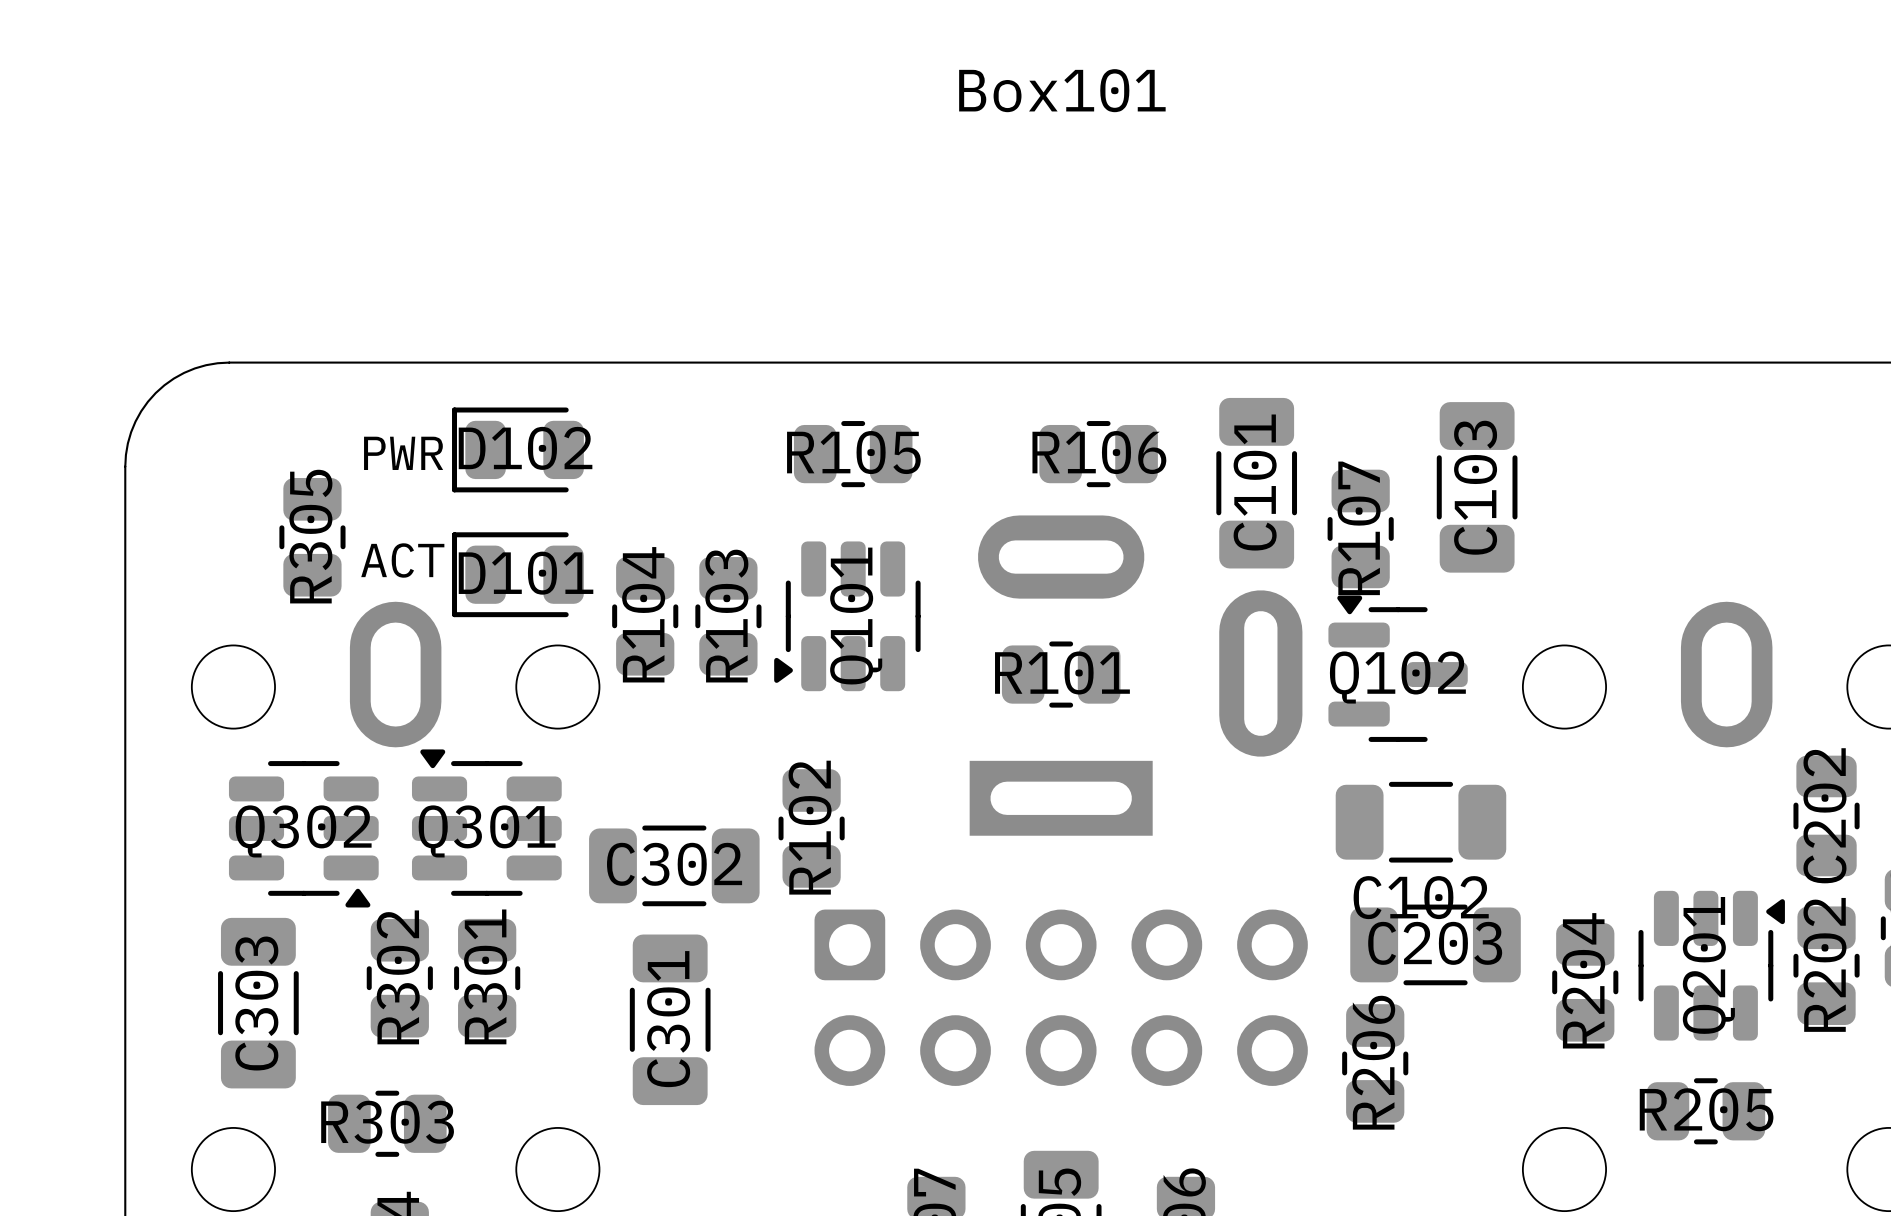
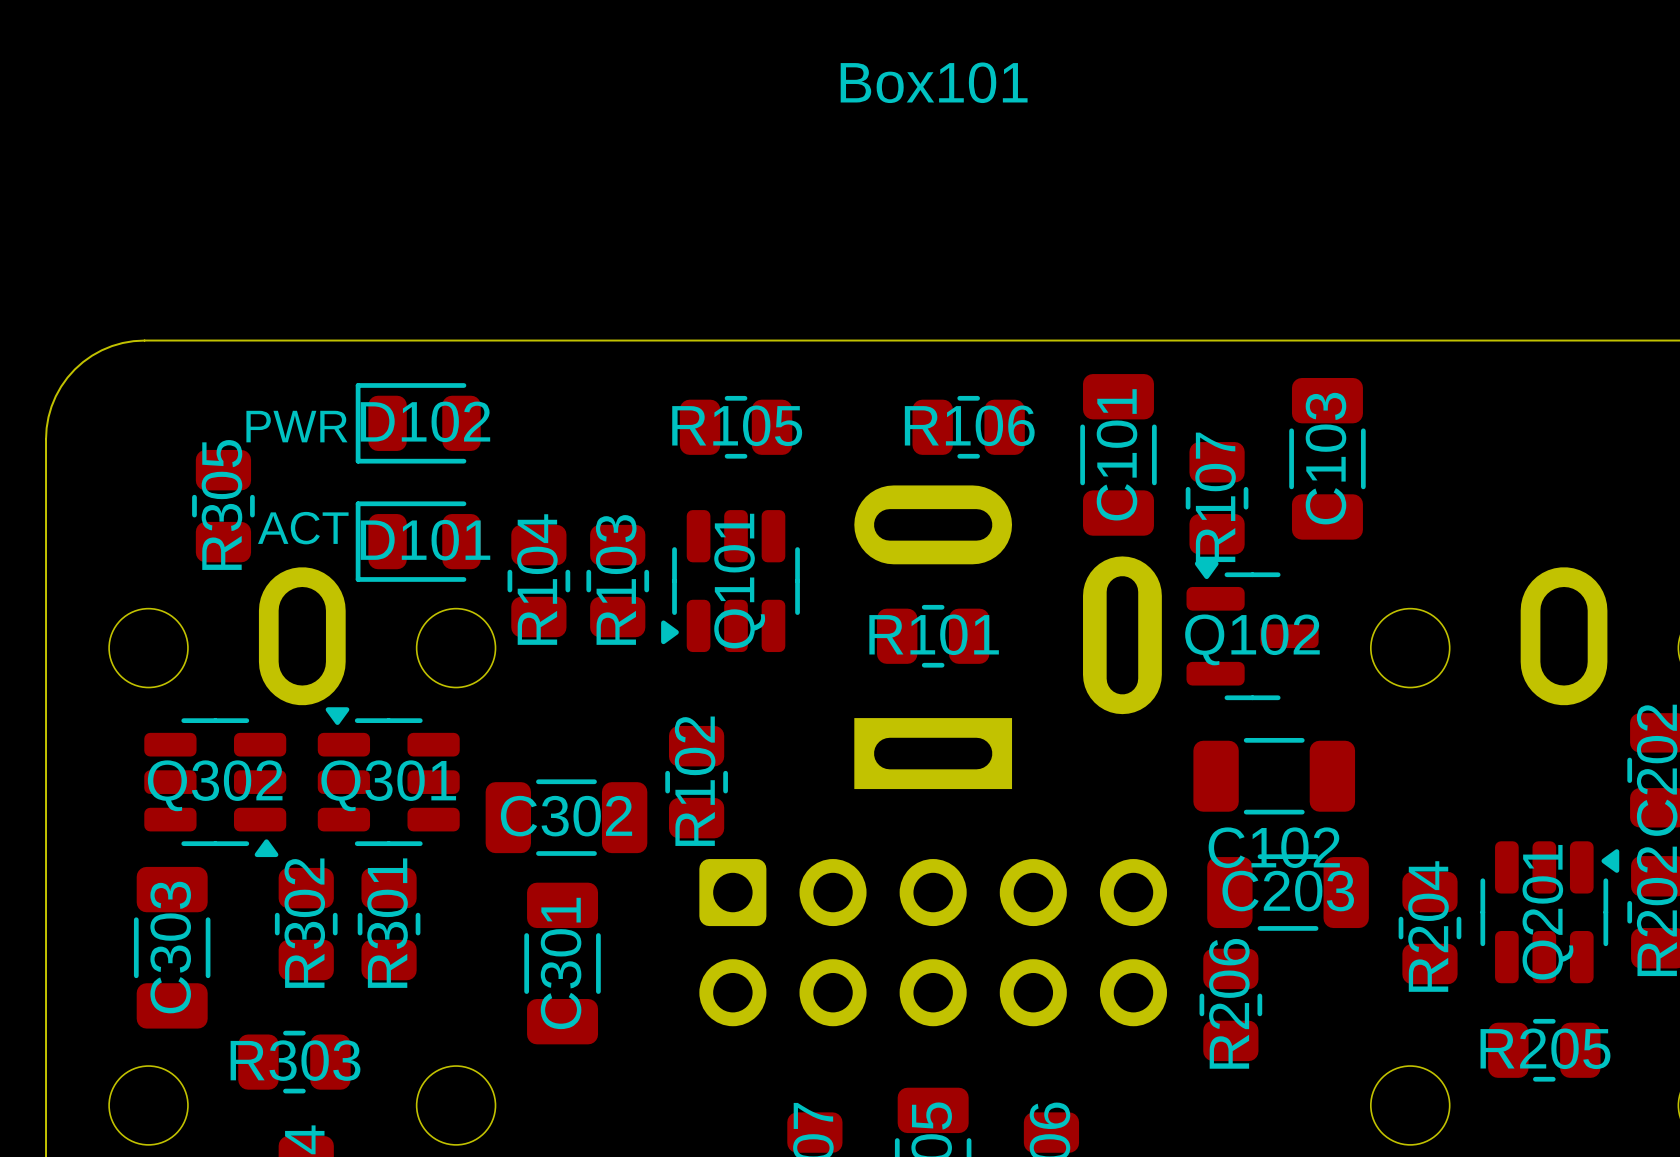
part footprint: [969, 515, 1303, 836] -> [854, 485, 1162, 790]

